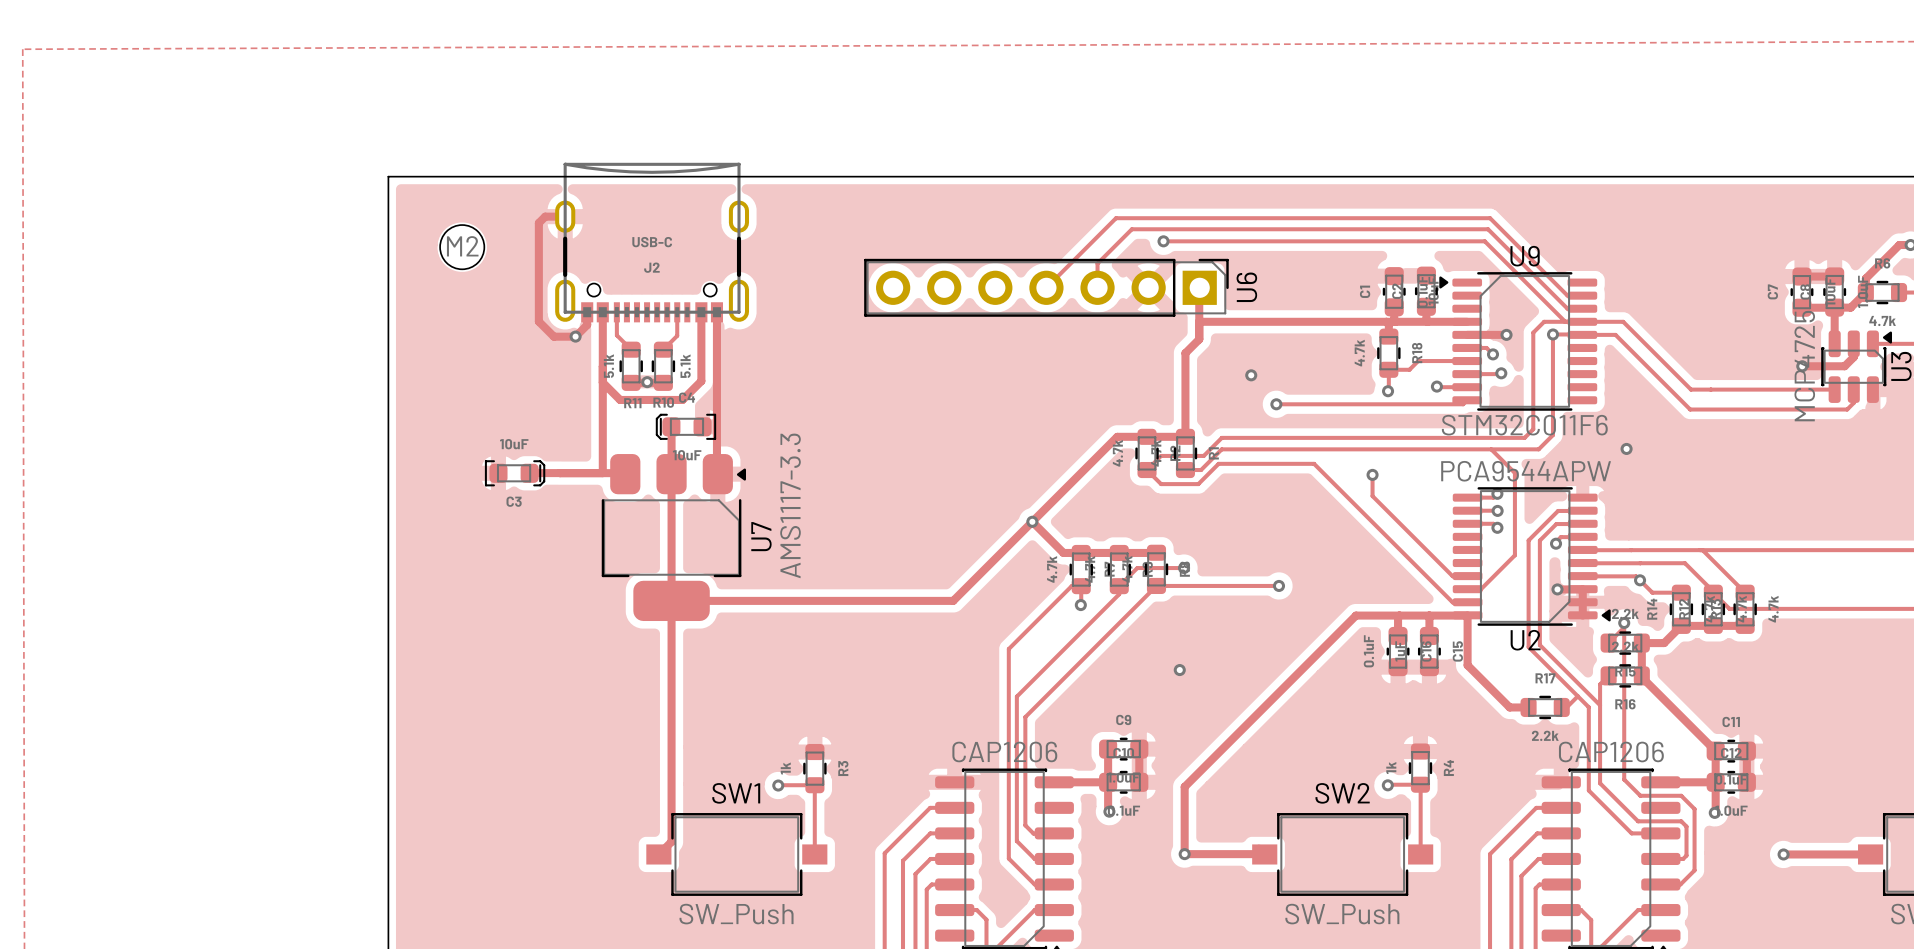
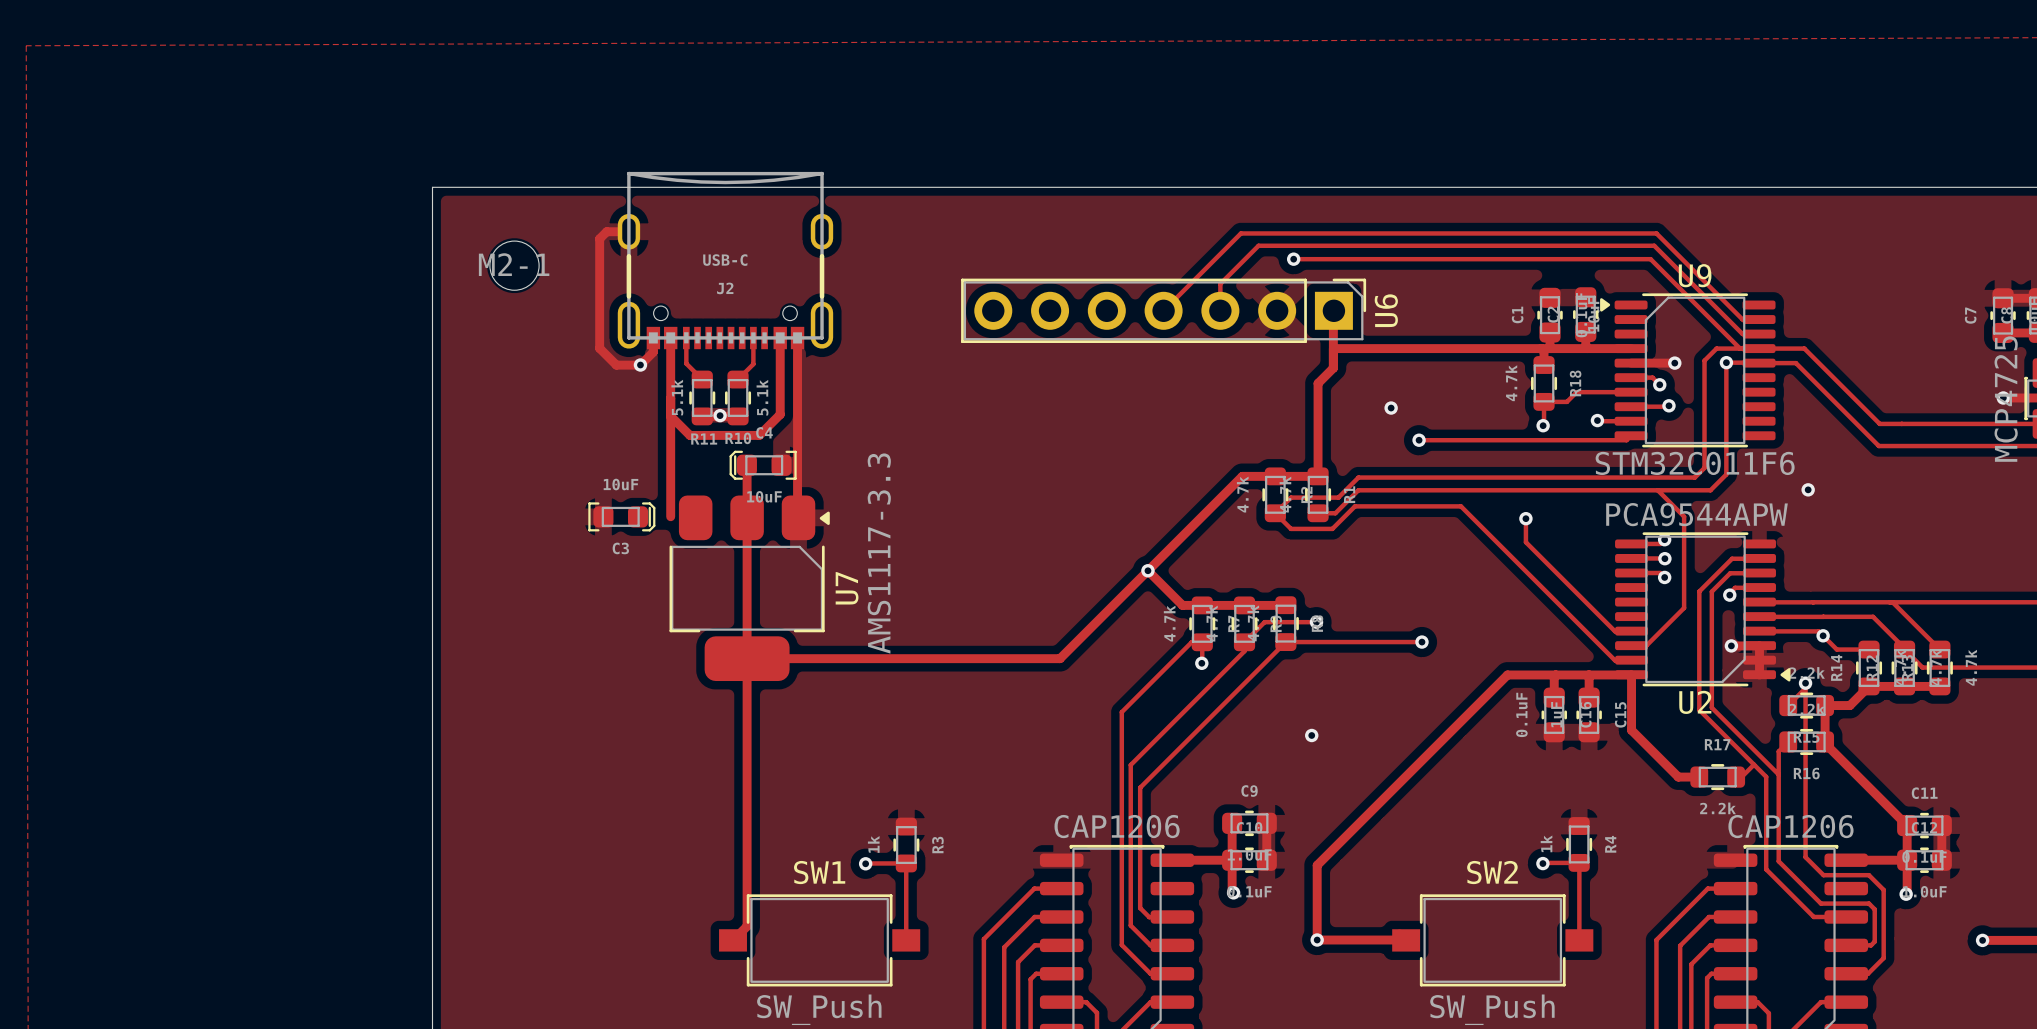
M2 name: M2 (462, 246) -> M2-1 (514, 264)
C3 position: (515, 473) -> (621, 516)

